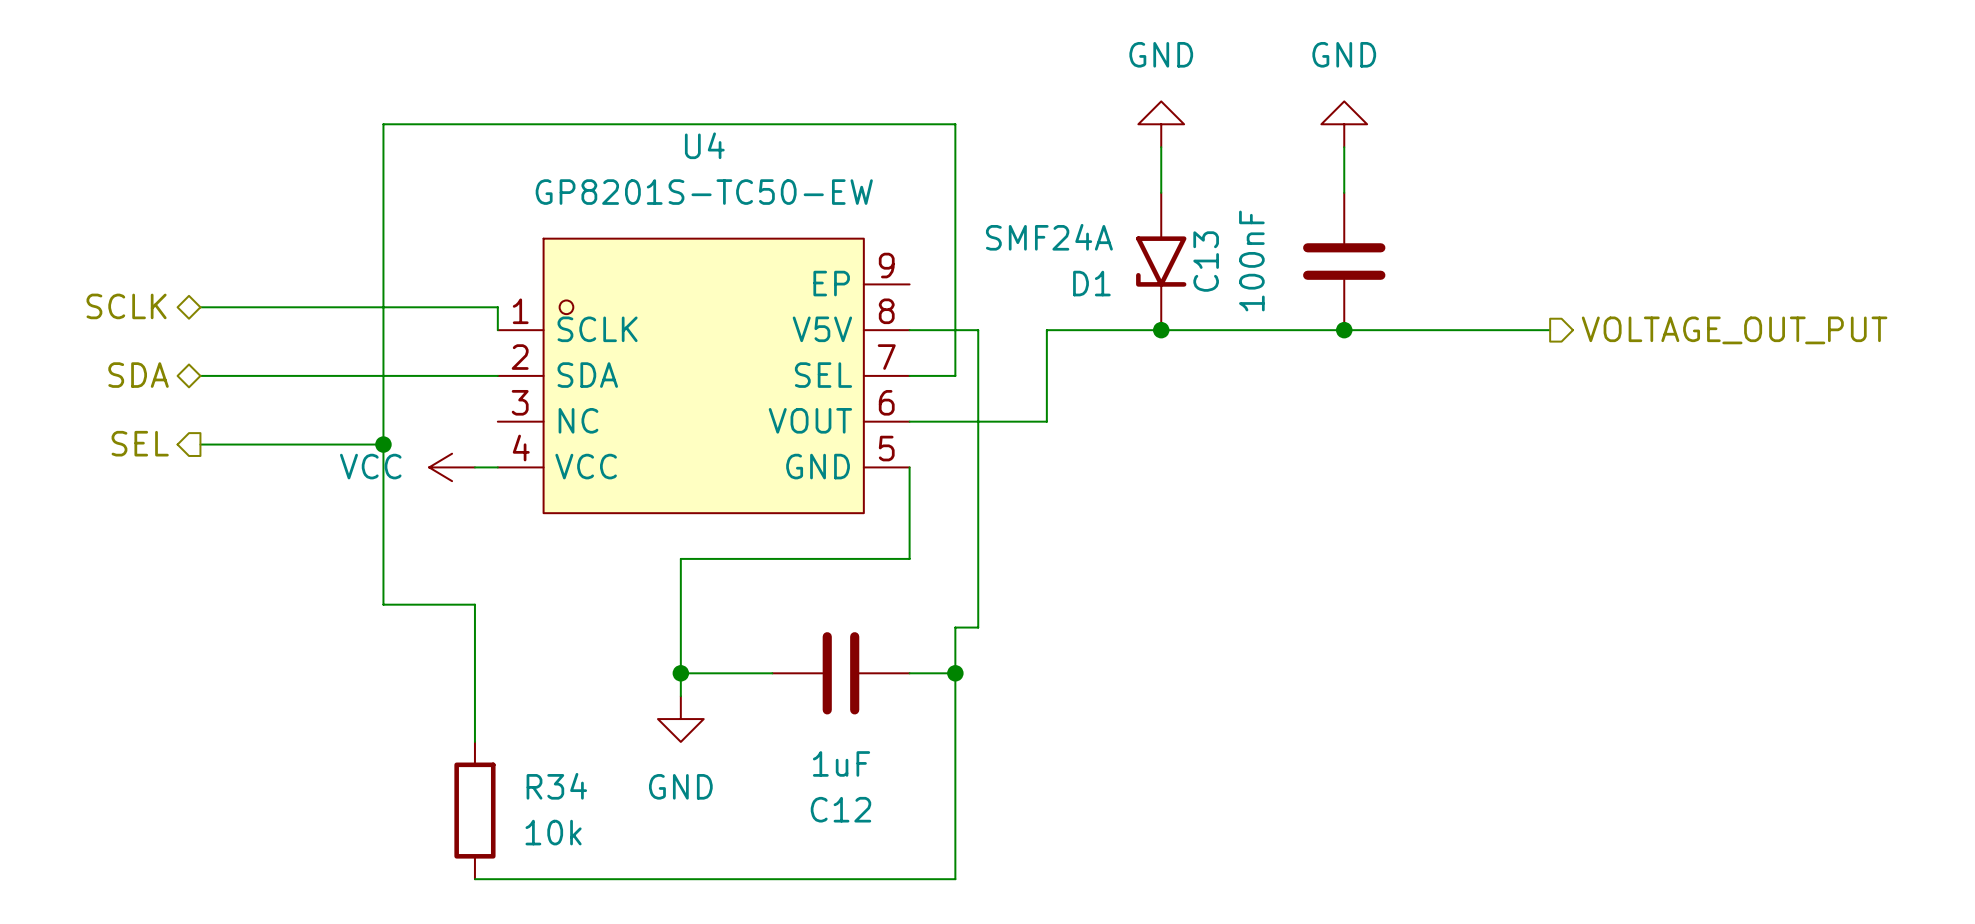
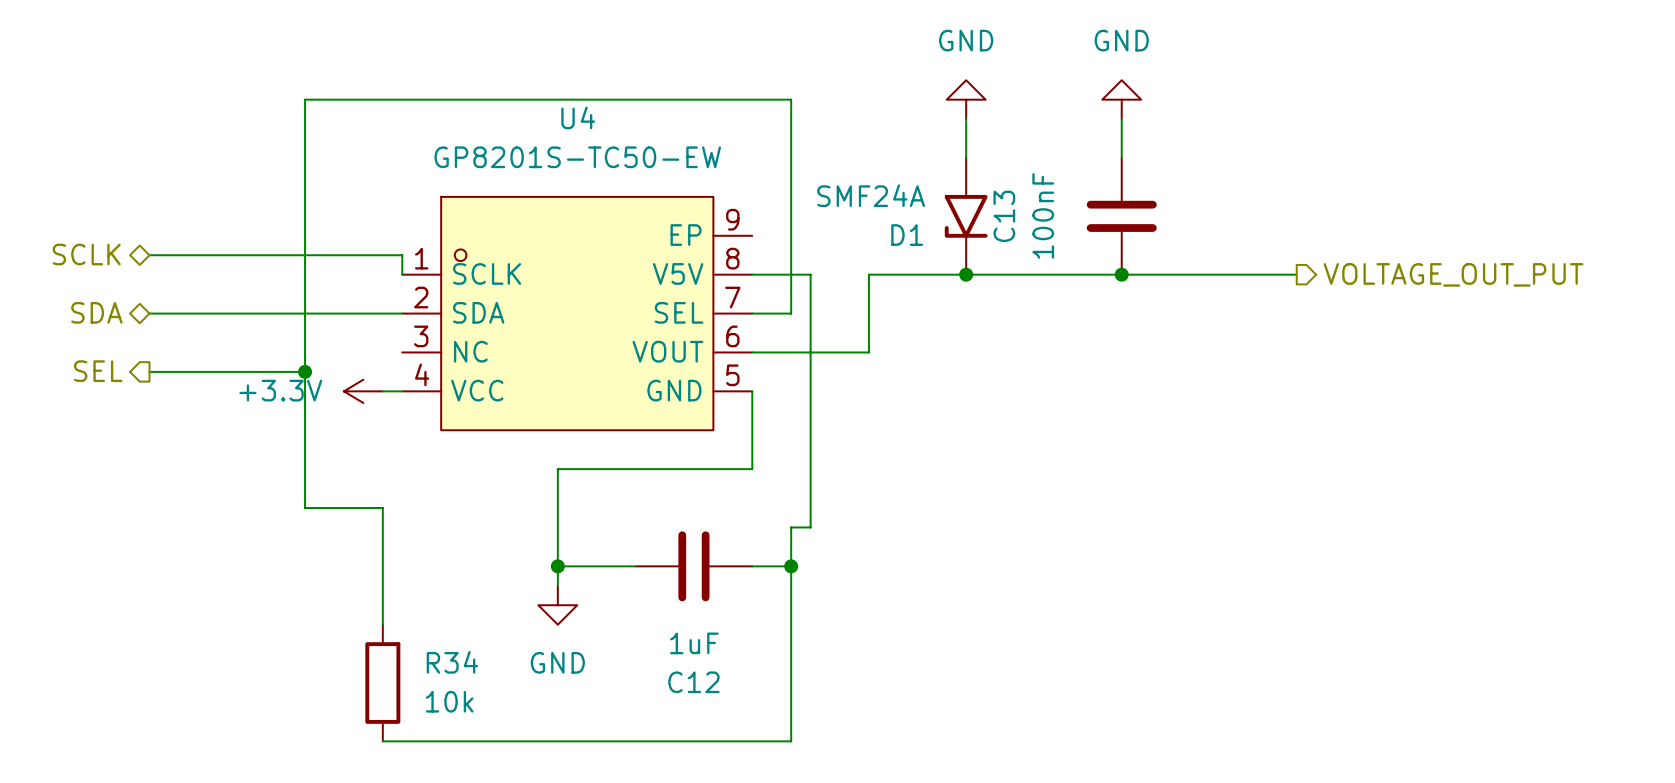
power symbol: VCC (452, 467) -> +3.3V (363, 391)

